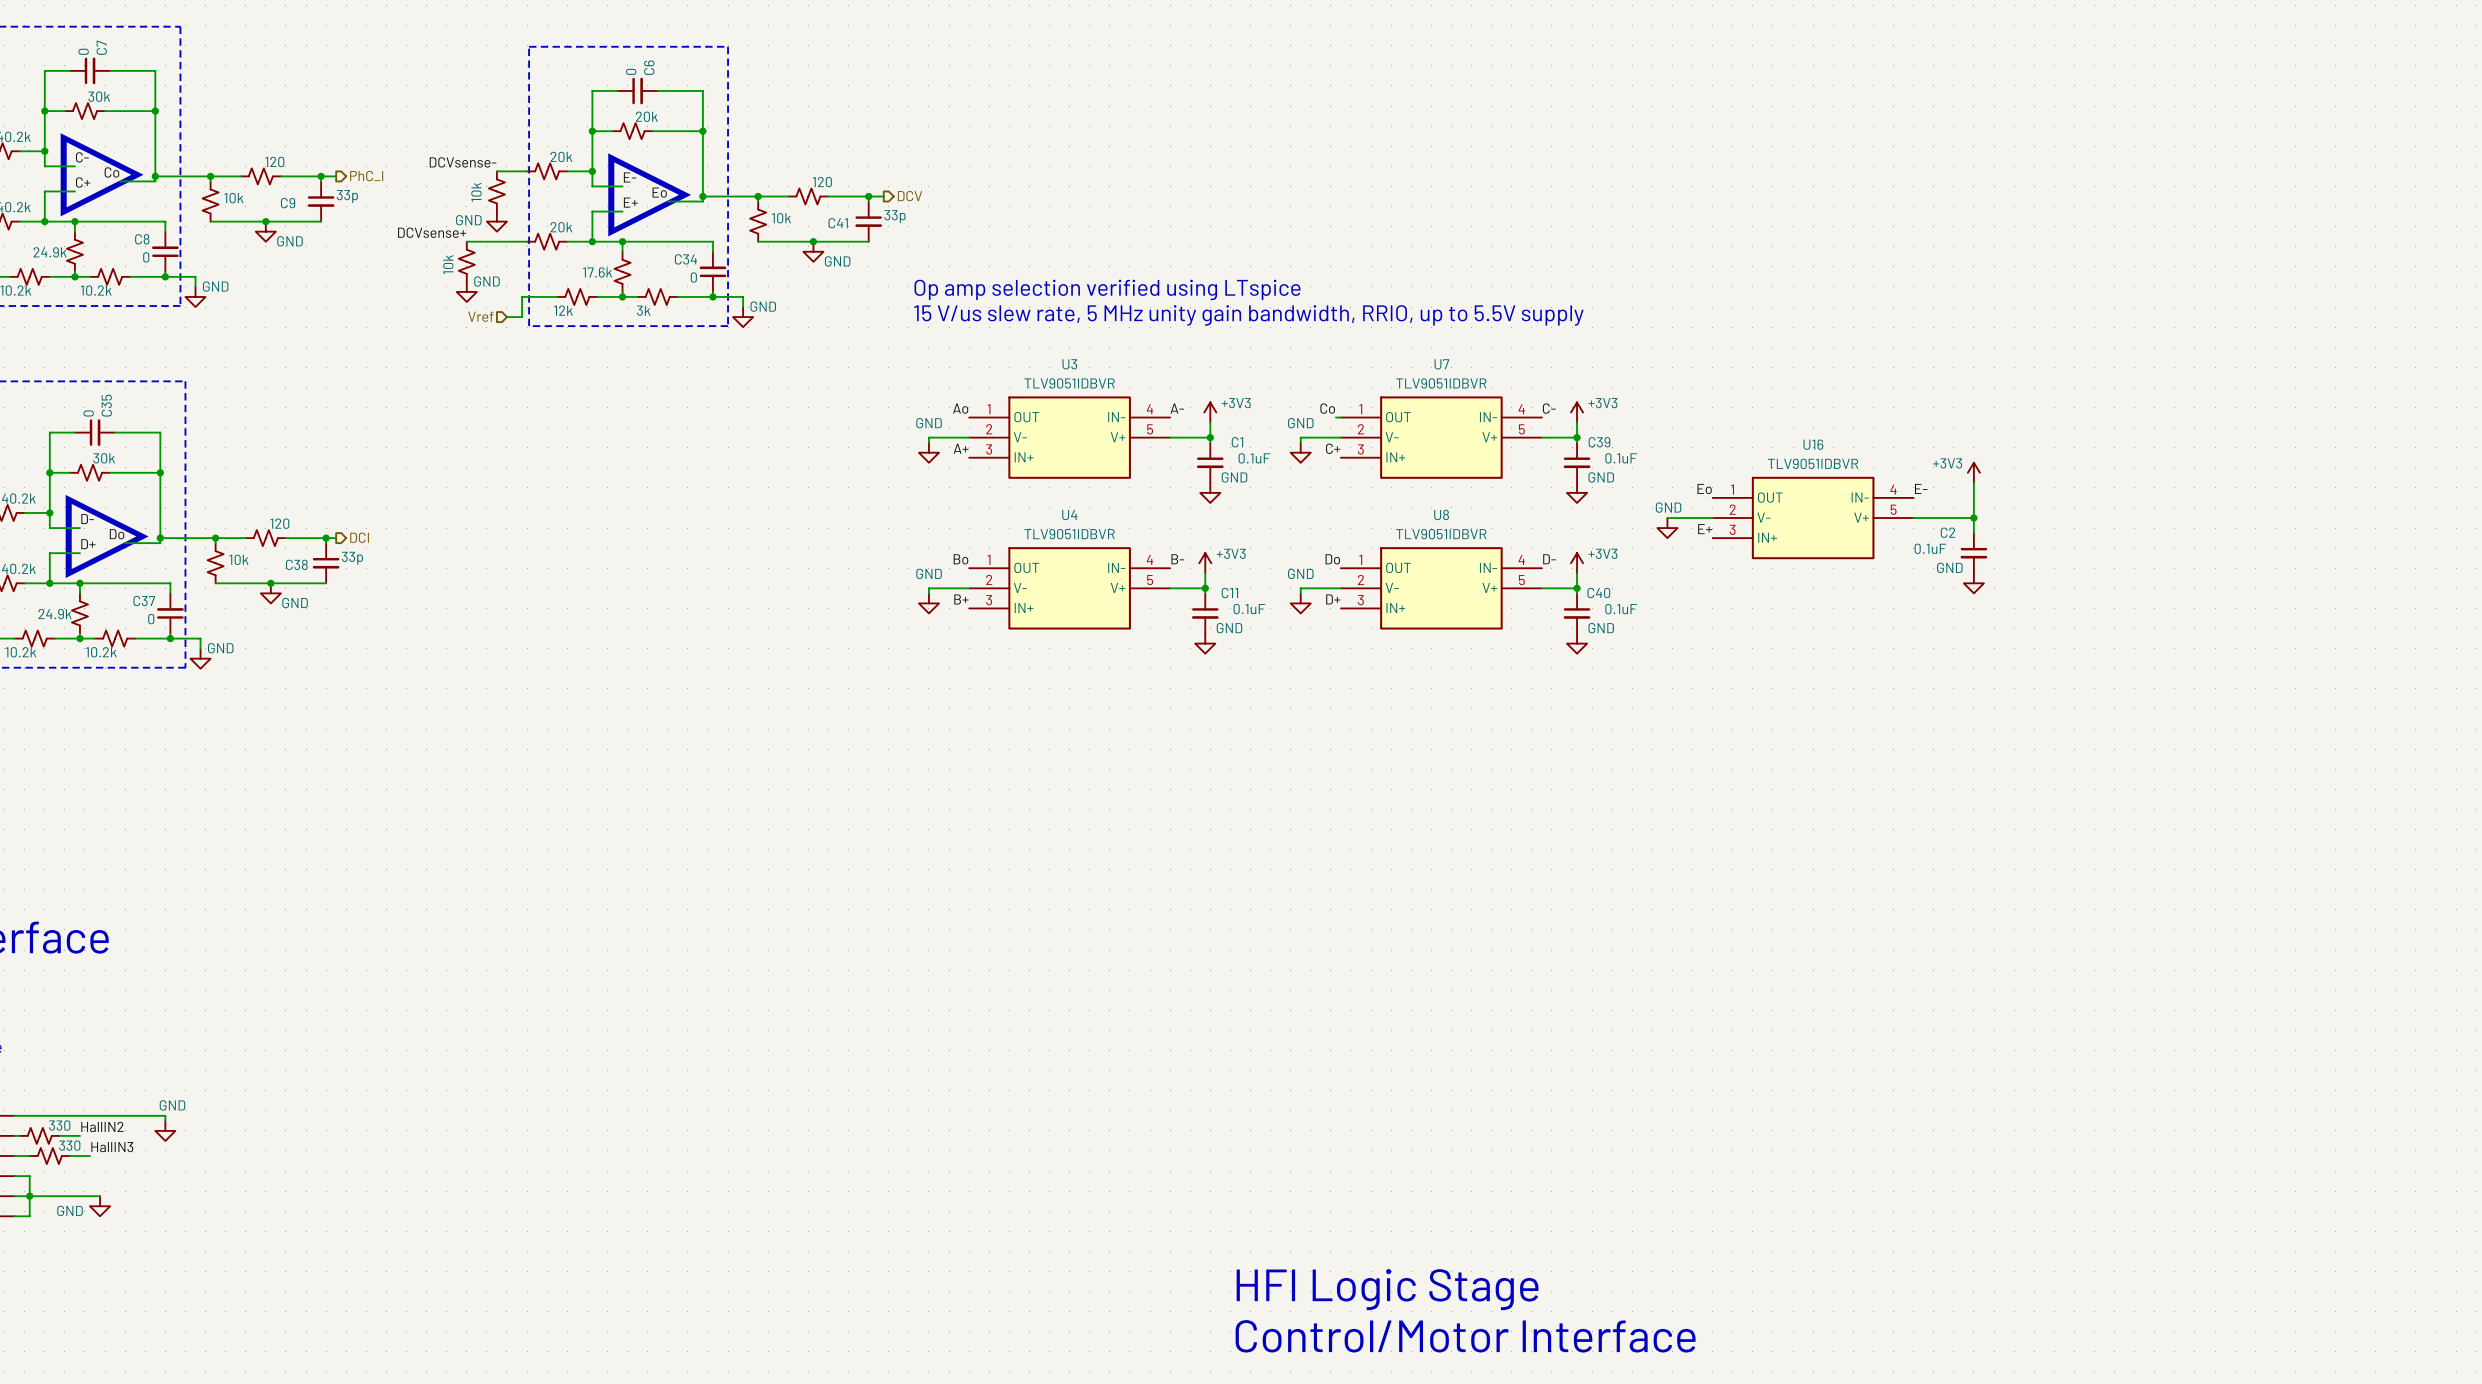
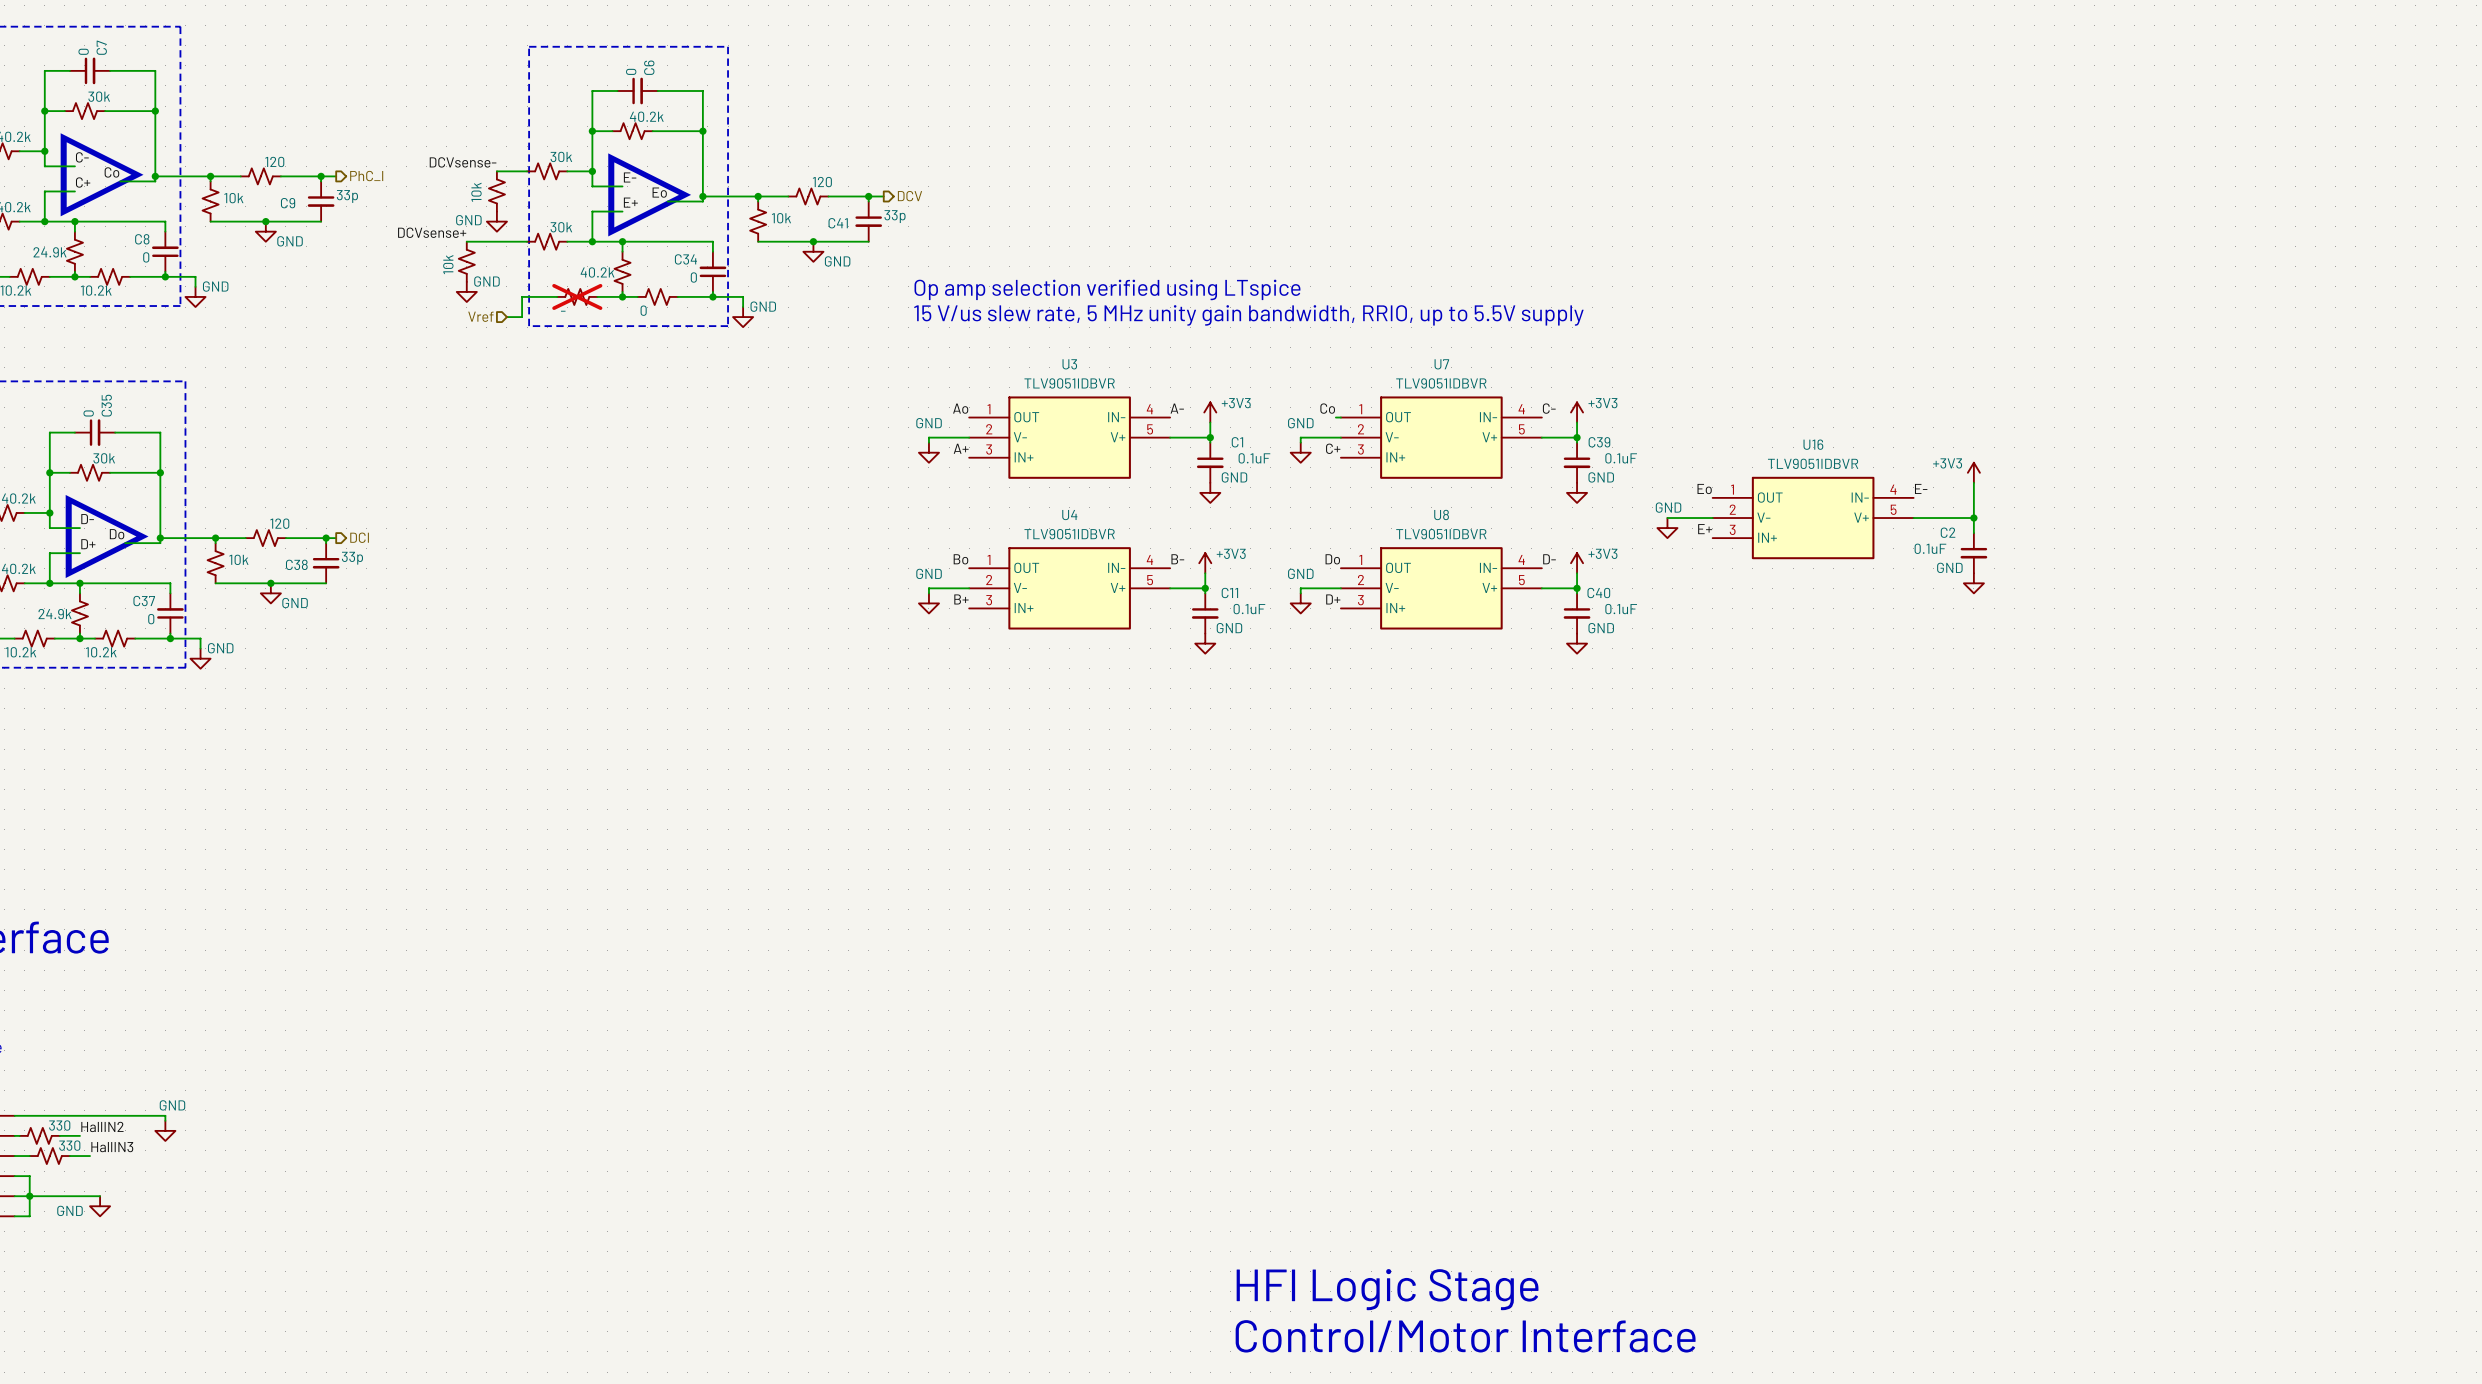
part value: 20k (646, 116) -> 40.2k (646, 116)
part value: 20k (561, 156) -> 30k (561, 156)
part value: 20k (561, 227) -> 30k (561, 227)
part value: 17.6k (597, 272) -> 40.2k (597, 272)
part do-not-place cross: none -> (577, 296)
part value: 12k (563, 310) -> - (563, 311)
part value: 3k (643, 310) -> 0 (643, 310)

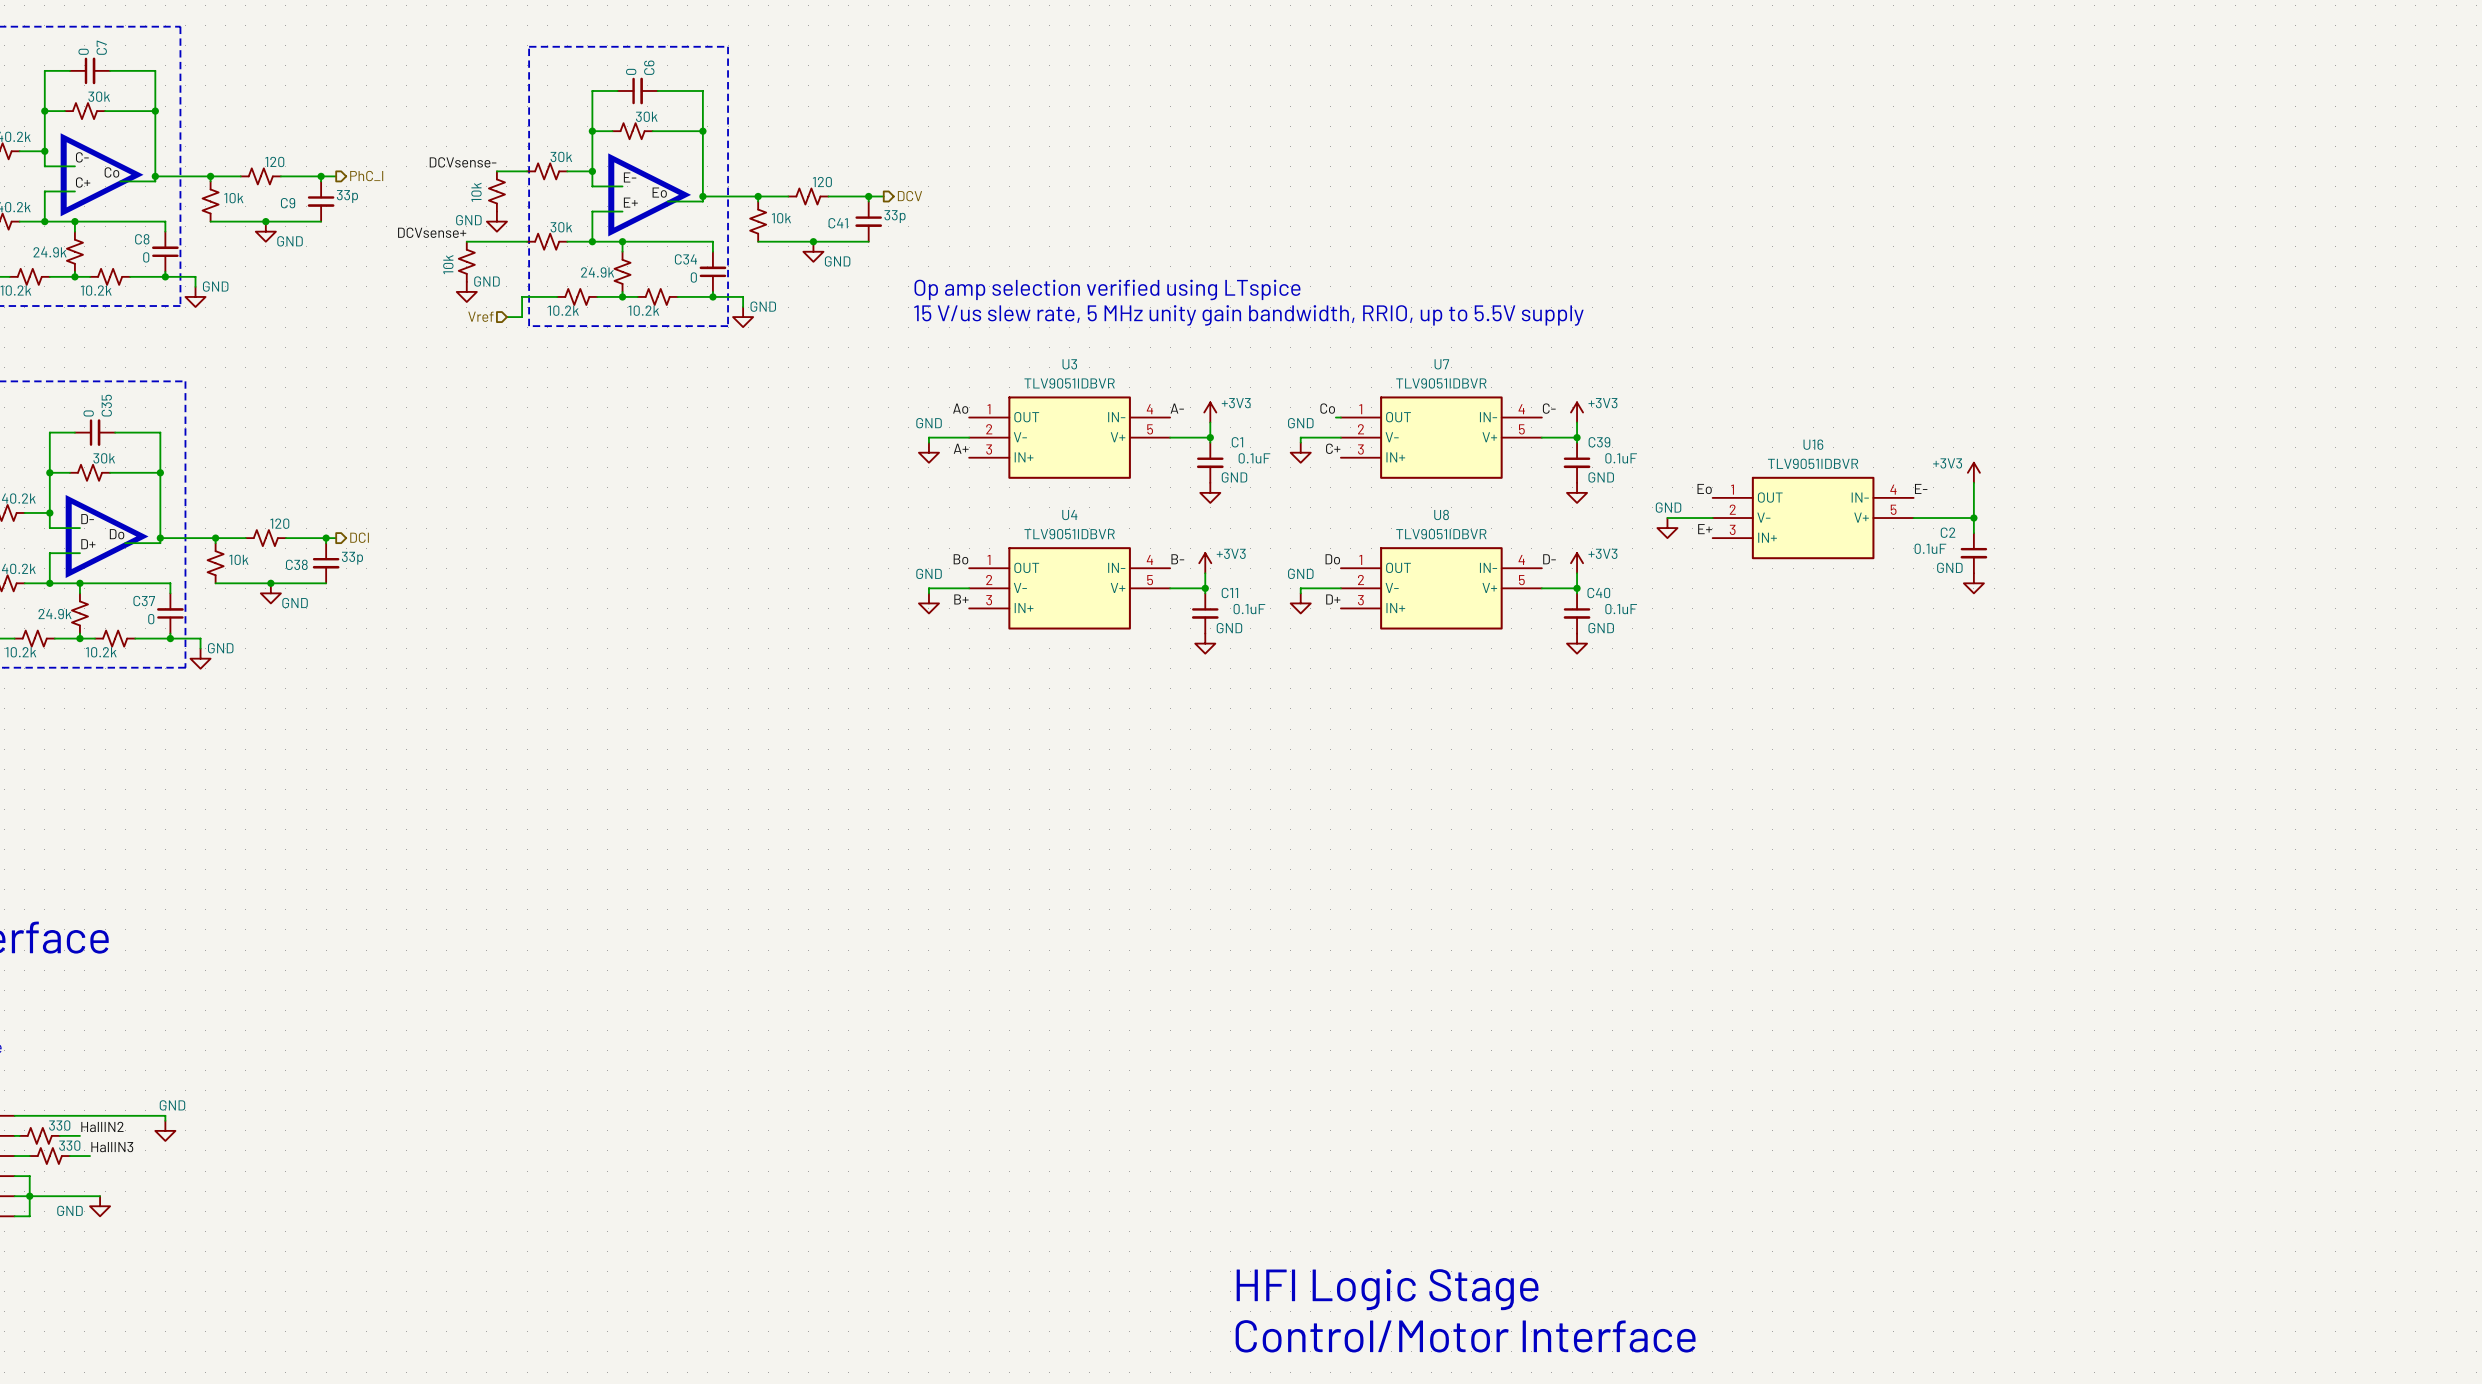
part value: 40.2k (646, 116) -> 30k (646, 116)
part value: 40.2k (597, 272) -> 24.9k (597, 272)
part do-not-place cross: (577, 296) -> none
part value: 0 (643, 310) -> 10.2k (643, 310)
part value: - (563, 311) -> 10.2k (563, 310)

